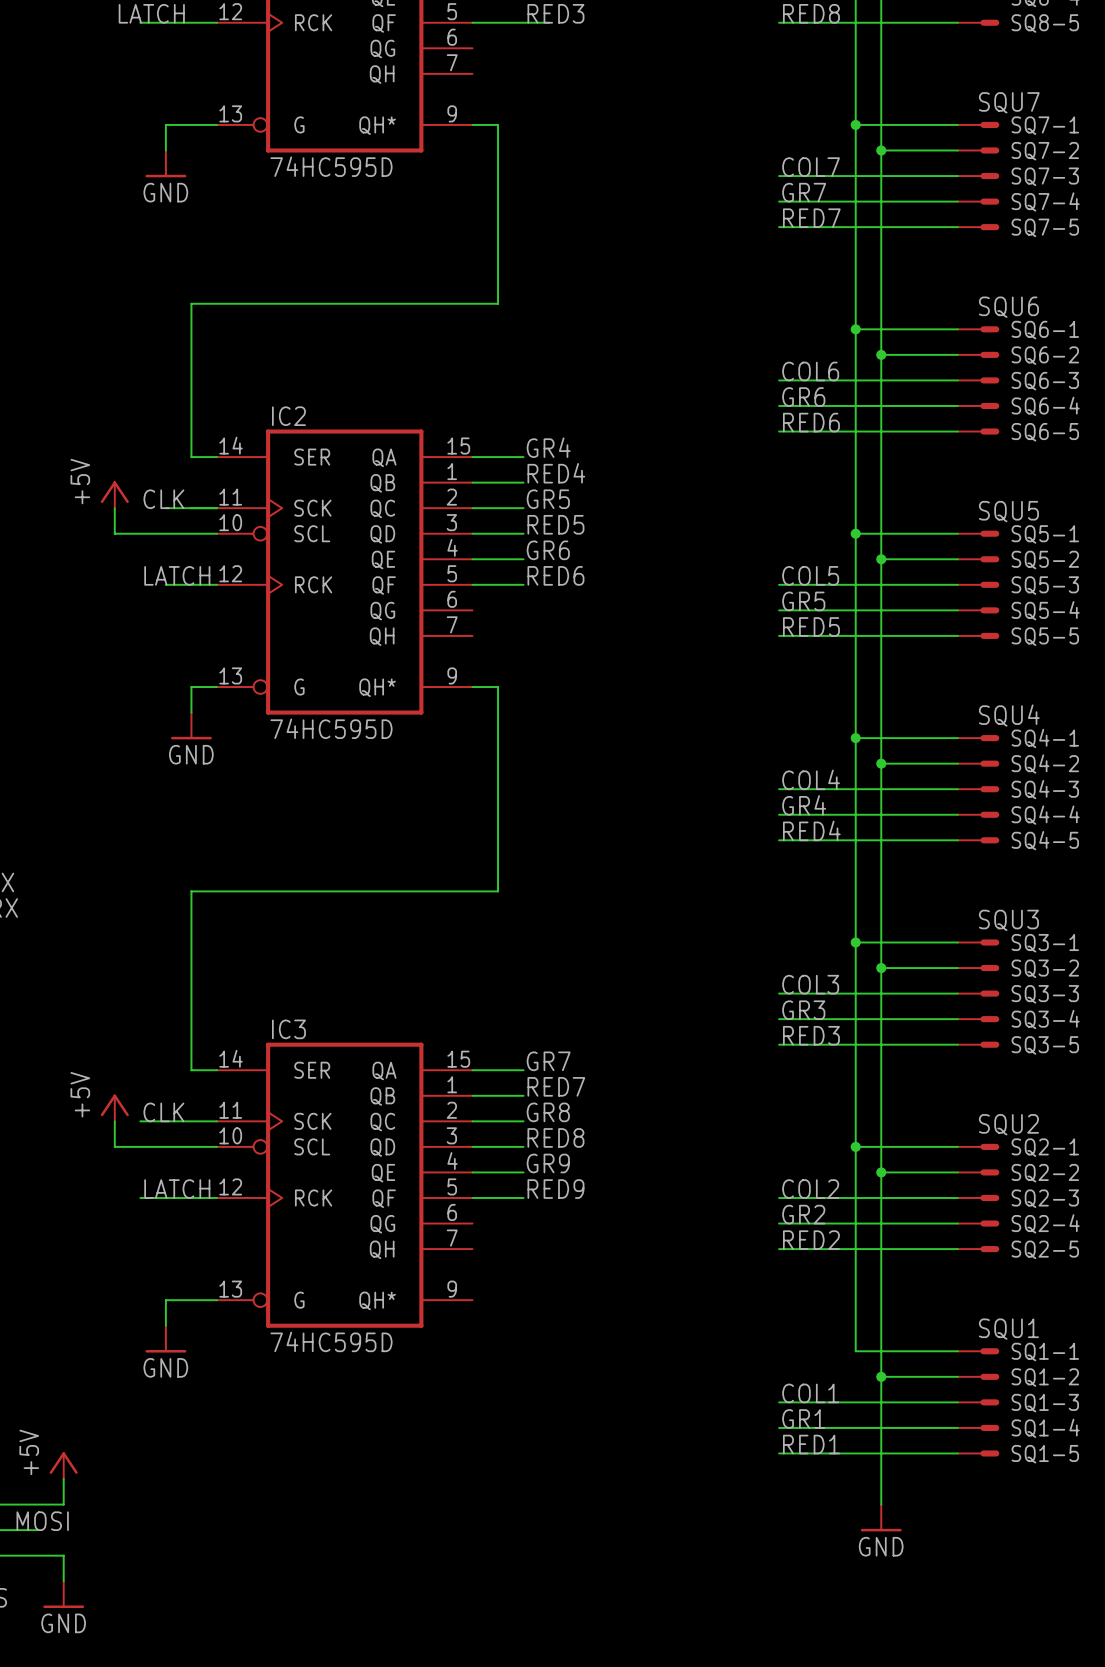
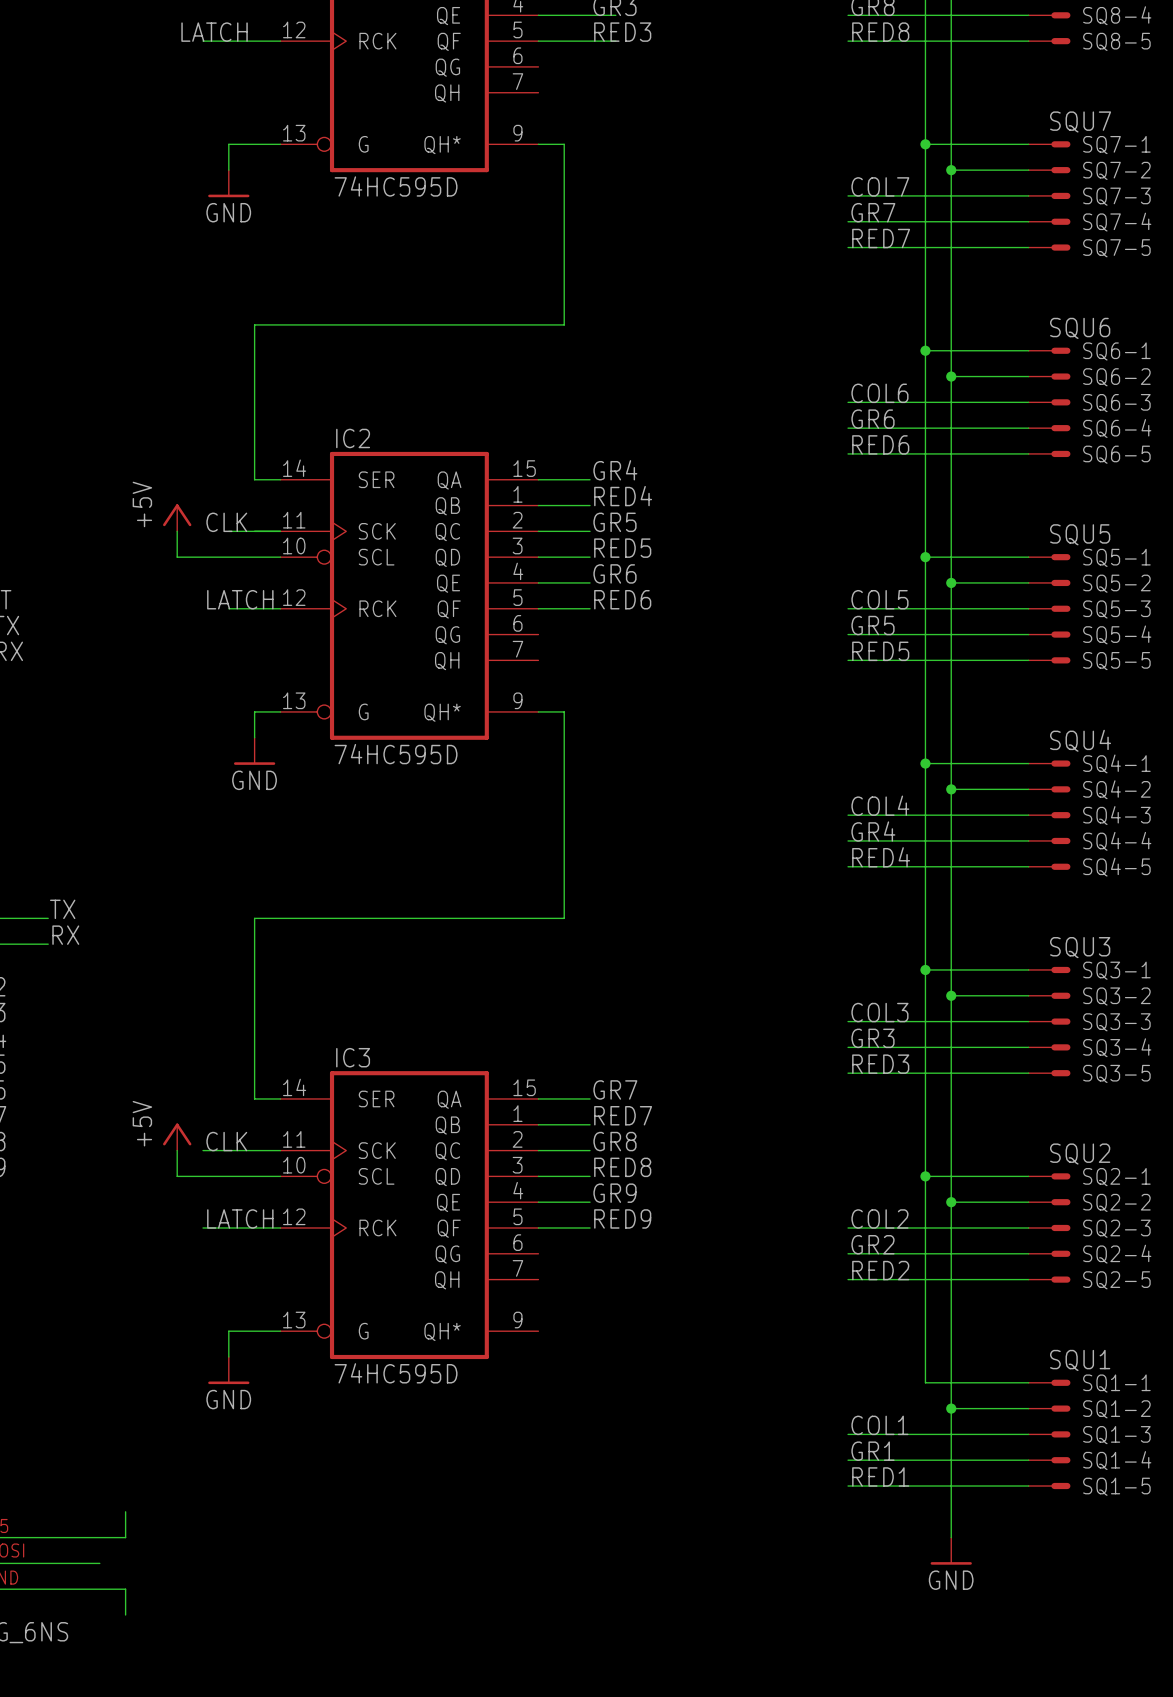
power symbol: +5V (63, 1465) -> none
label: MOSI (42, 1521) -> none
power symbol: GND (63, 1594) -> none

